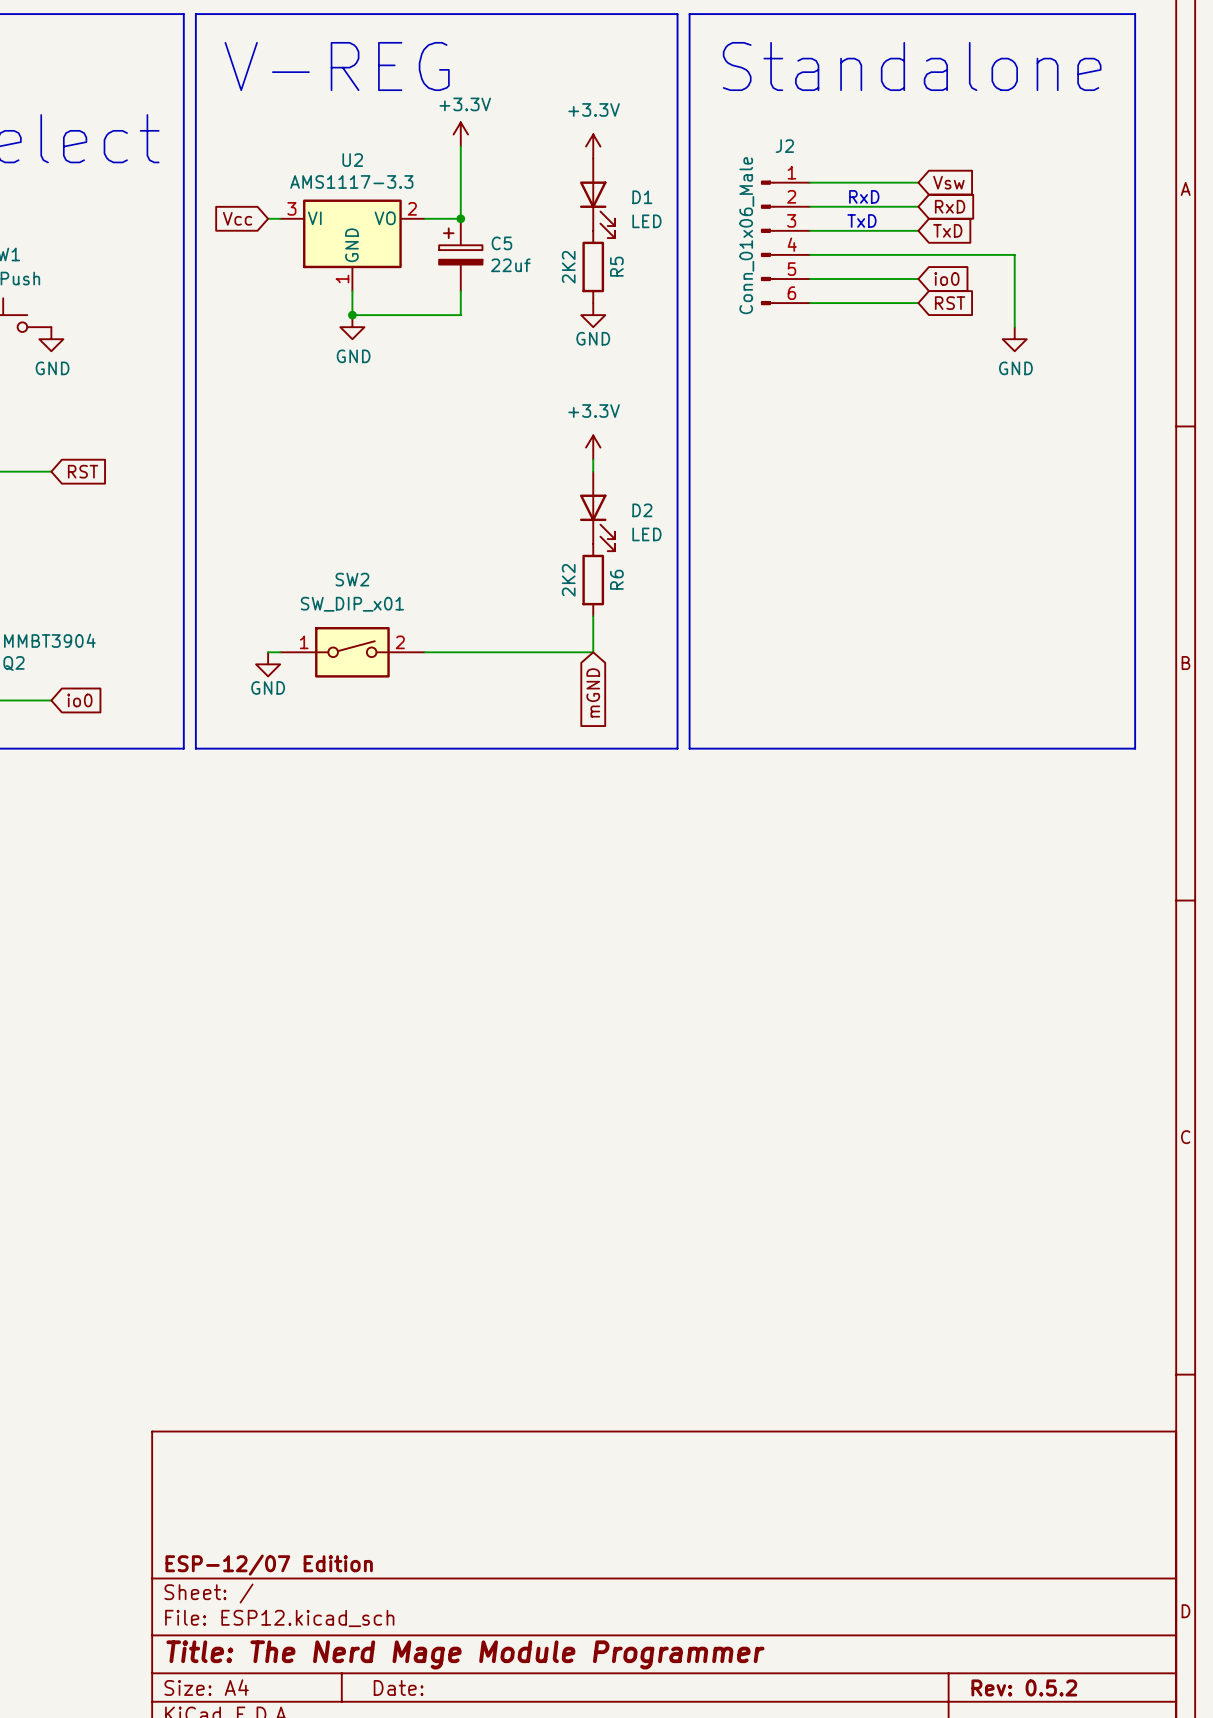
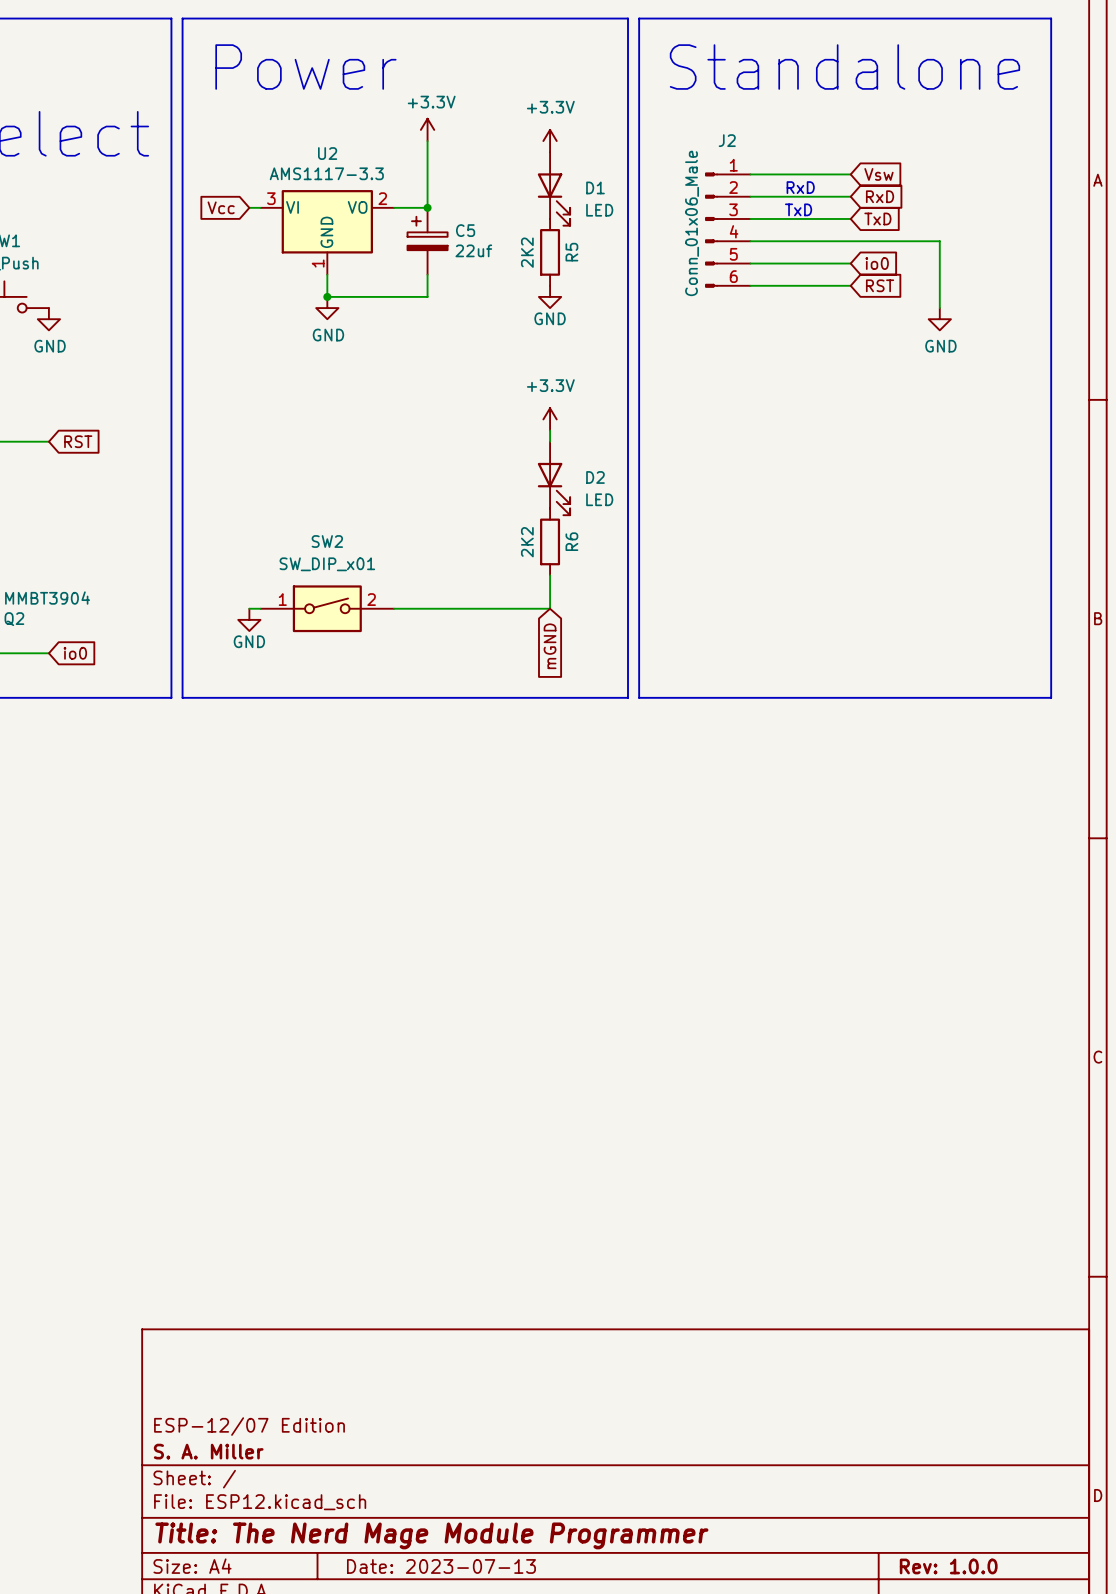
text: V-REG (337, 66) -> Power (305, 67)
title block: none -> ESP-12/07 Edition (249, 1426)
title block: ESP-12/07 Edition (269, 1565) -> S. A. Miller (208, 1451)
title block: Date: (398, 1687) -> Date: 2023-07-13 (441, 1566)
title block: Rev: 0.5.2 (1024, 1687) -> Rev: 1.0.0 (948, 1566)

